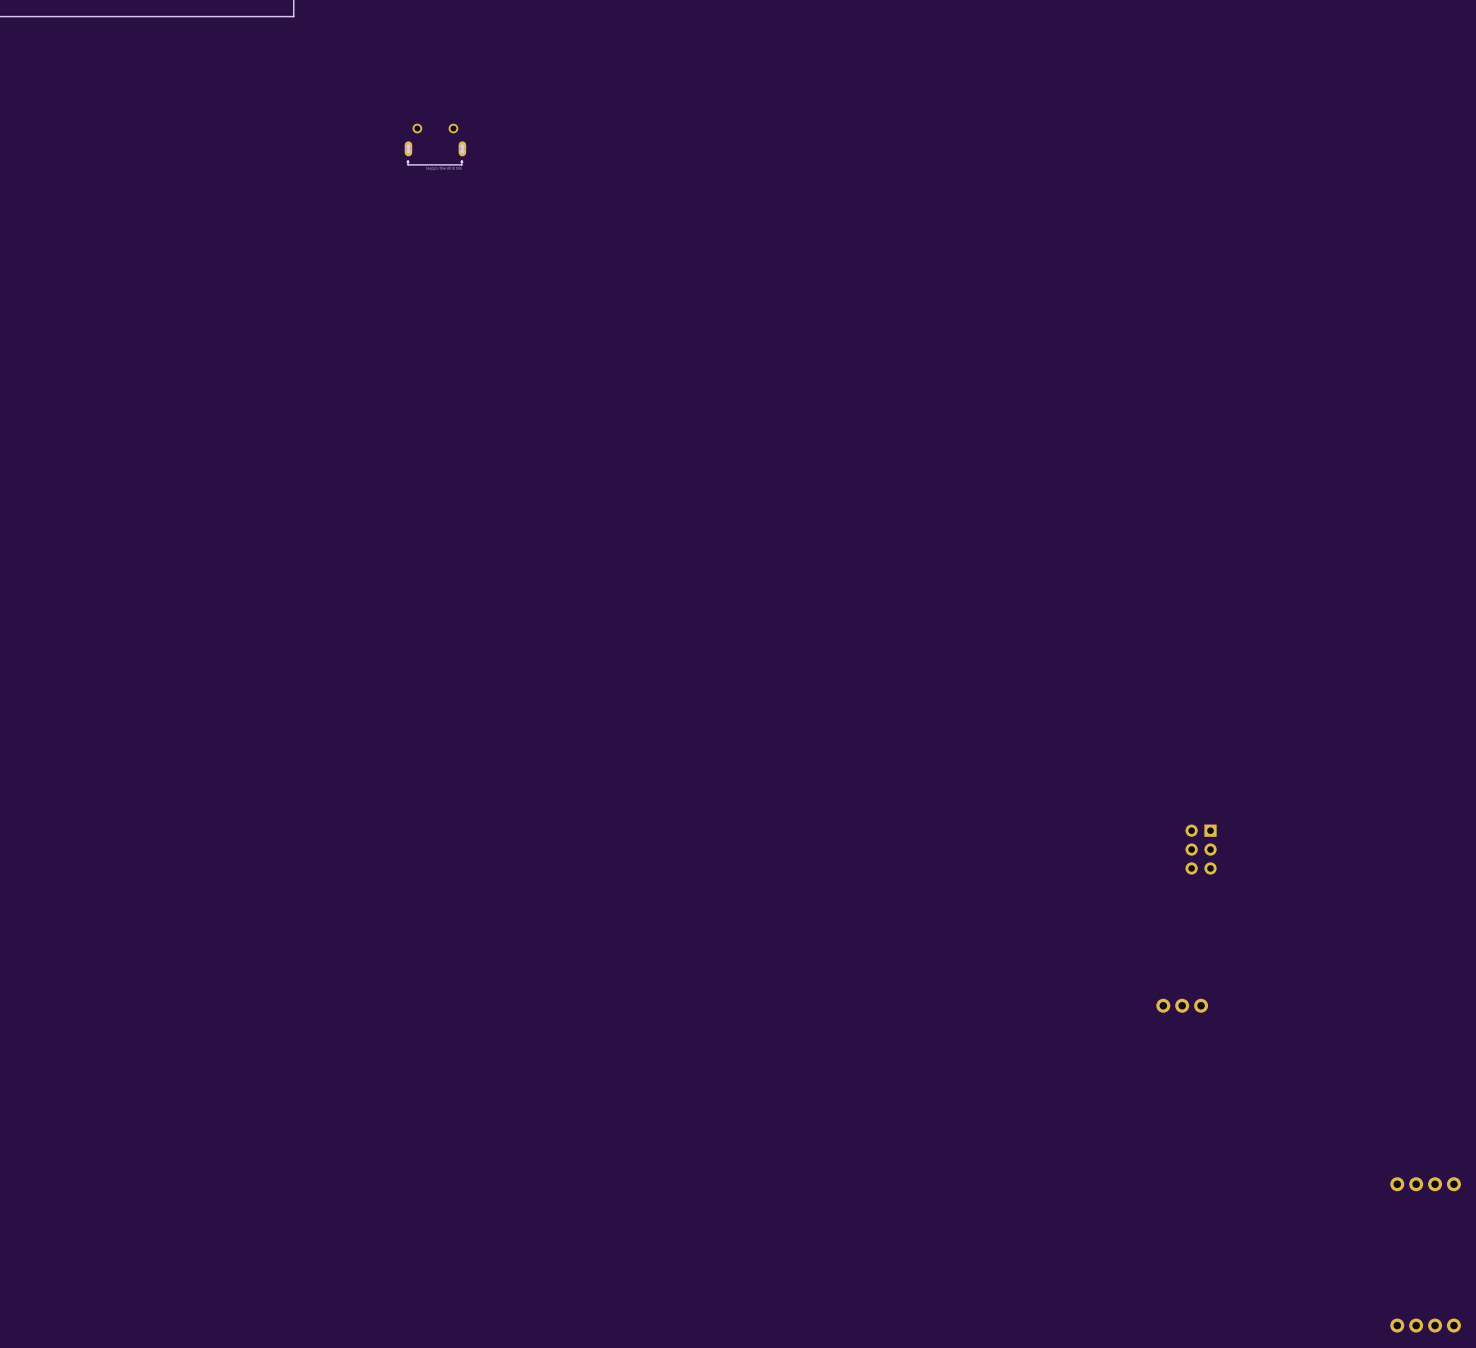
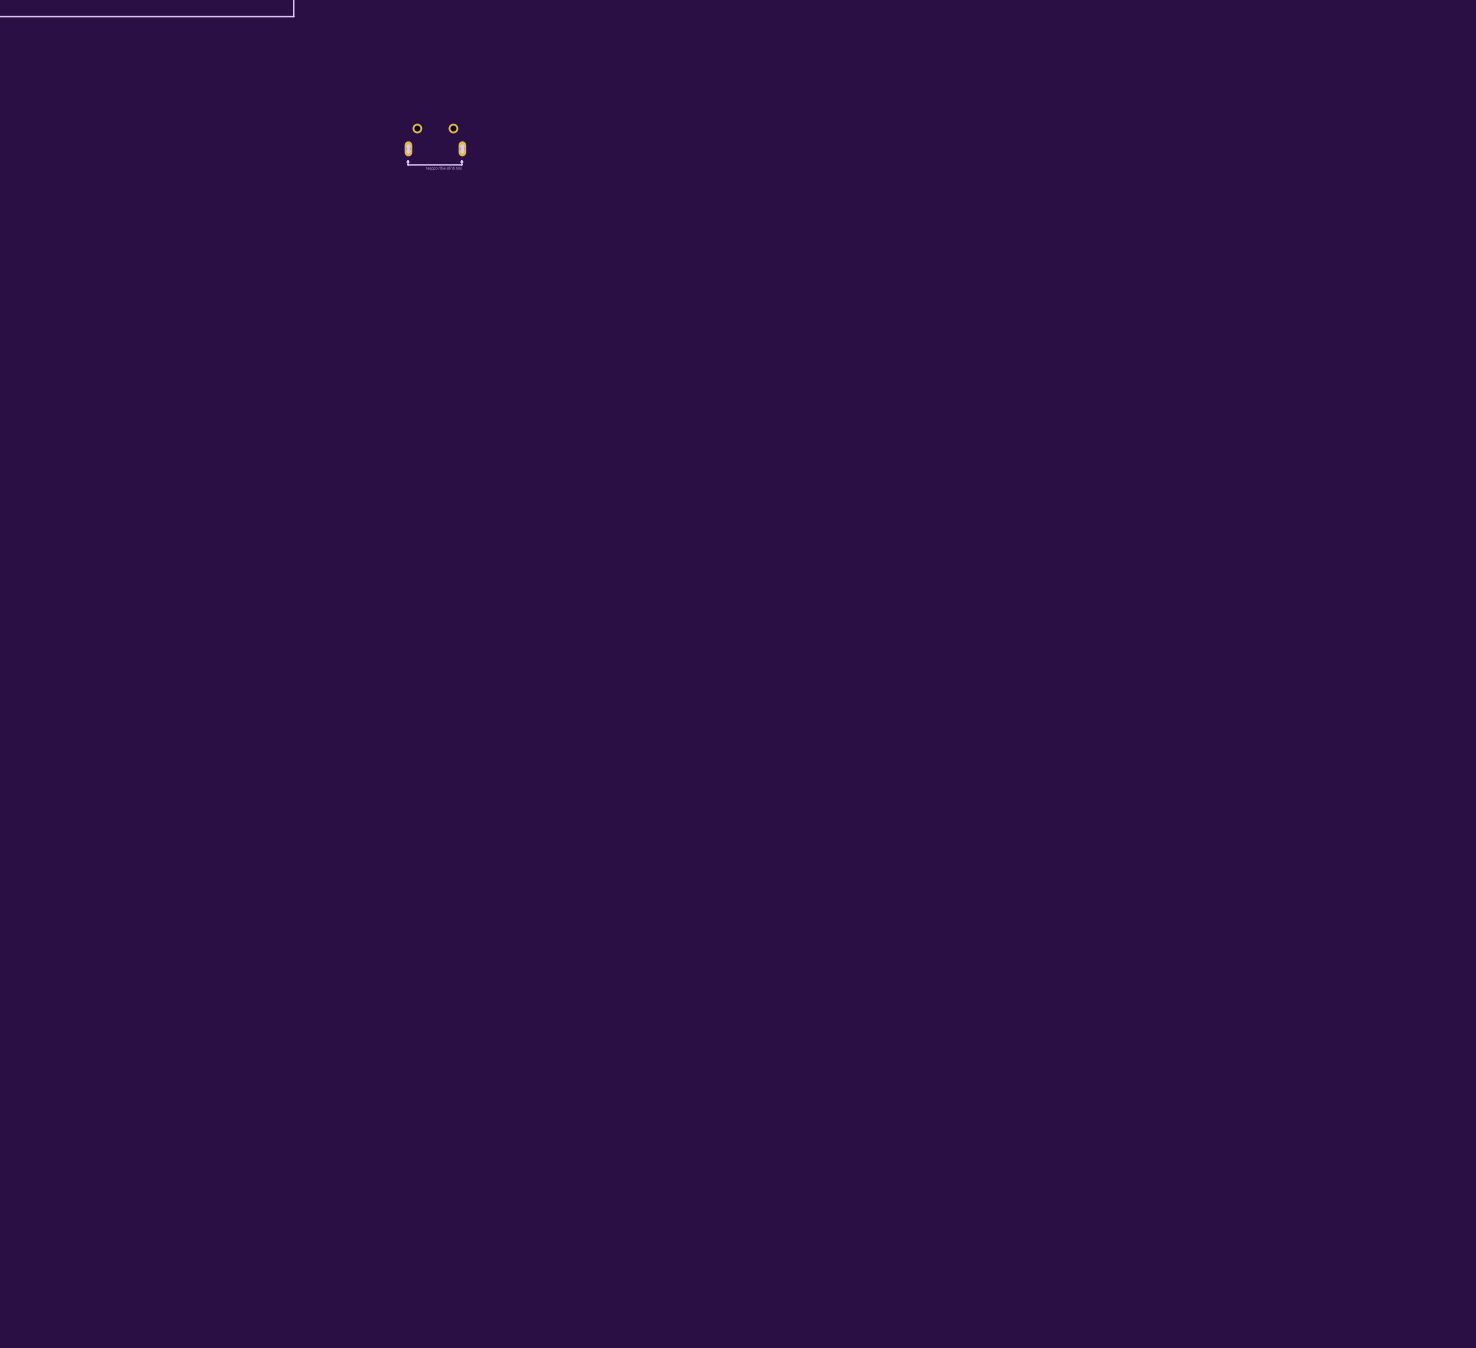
part: (1201, 849) -> none
part: (1182, 1005) -> none
part: (1425, 1184) -> none
part: (1425, 1325) -> none

